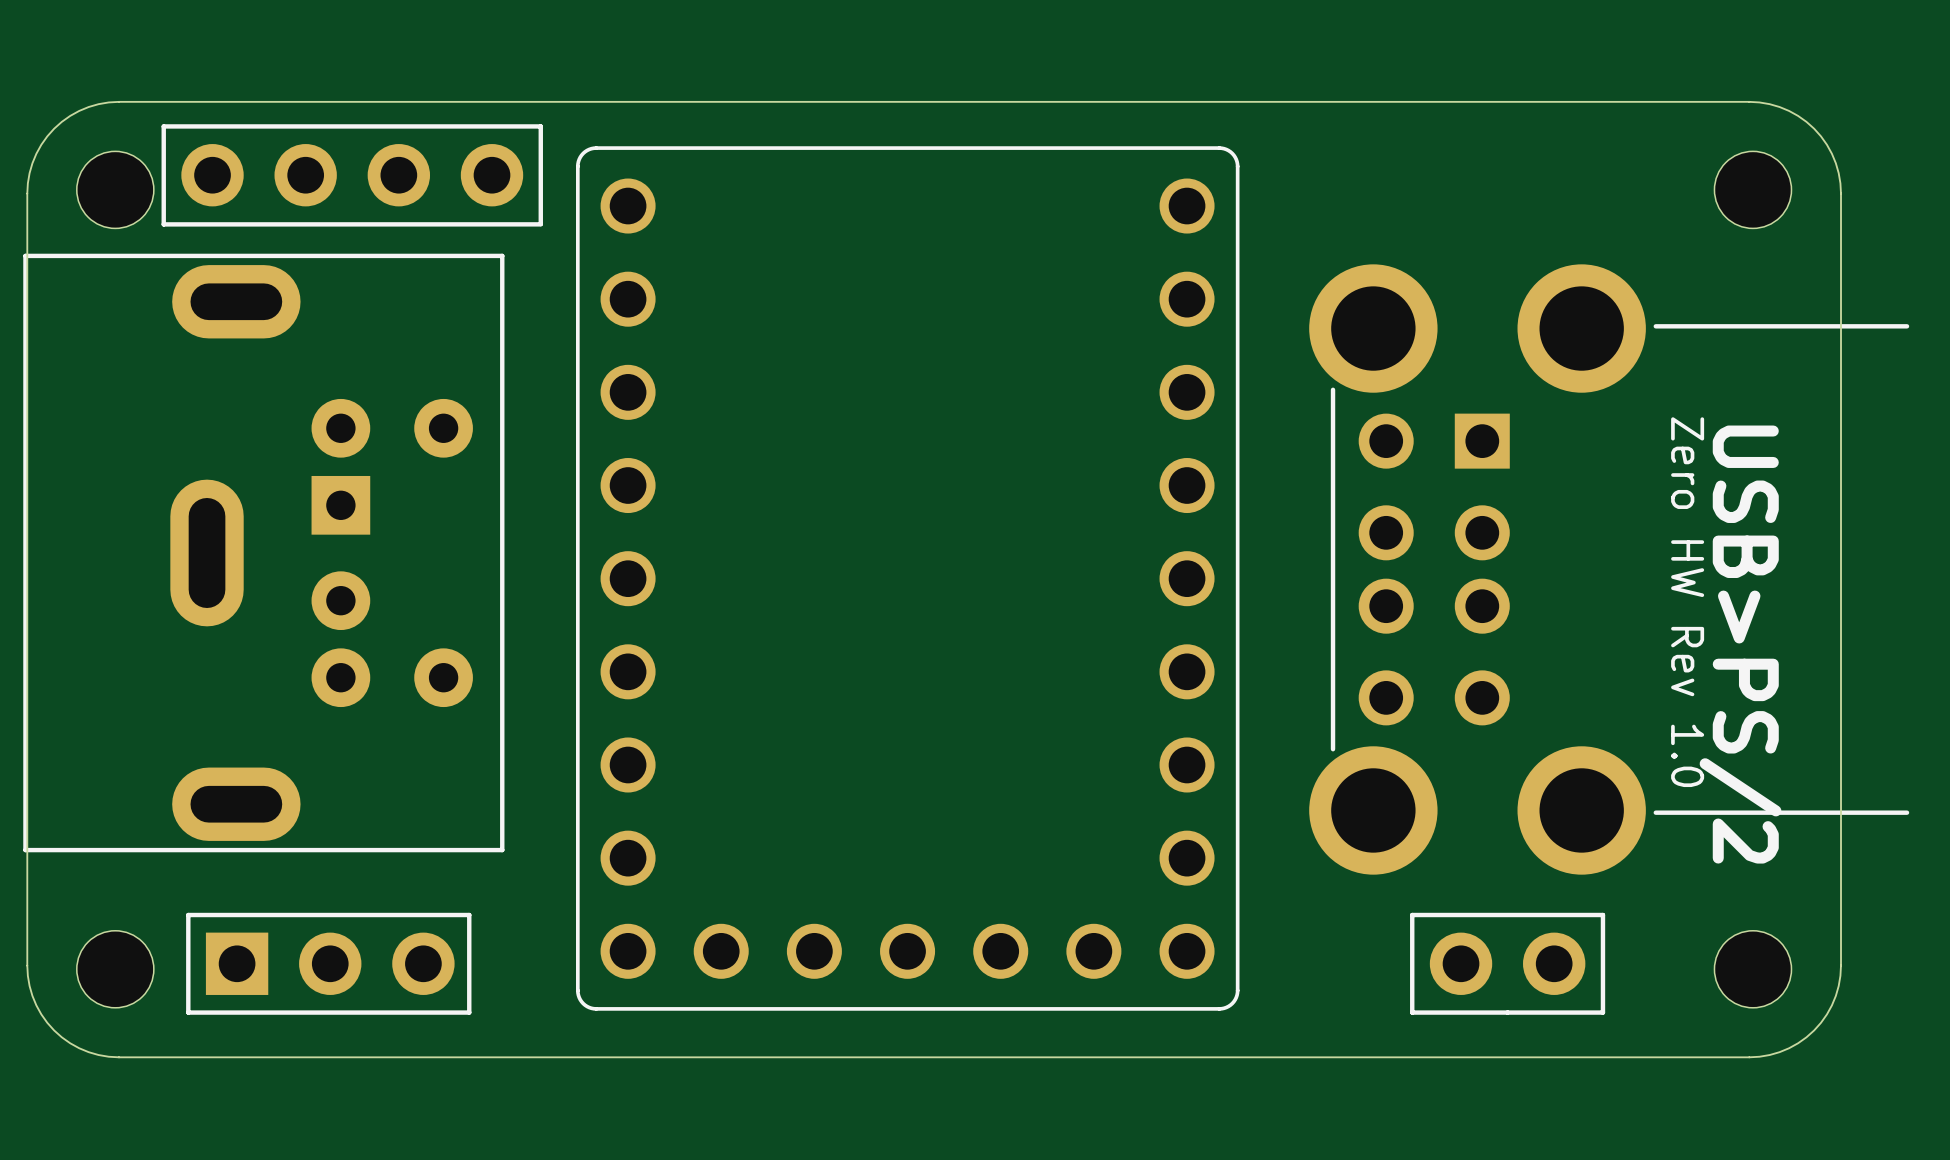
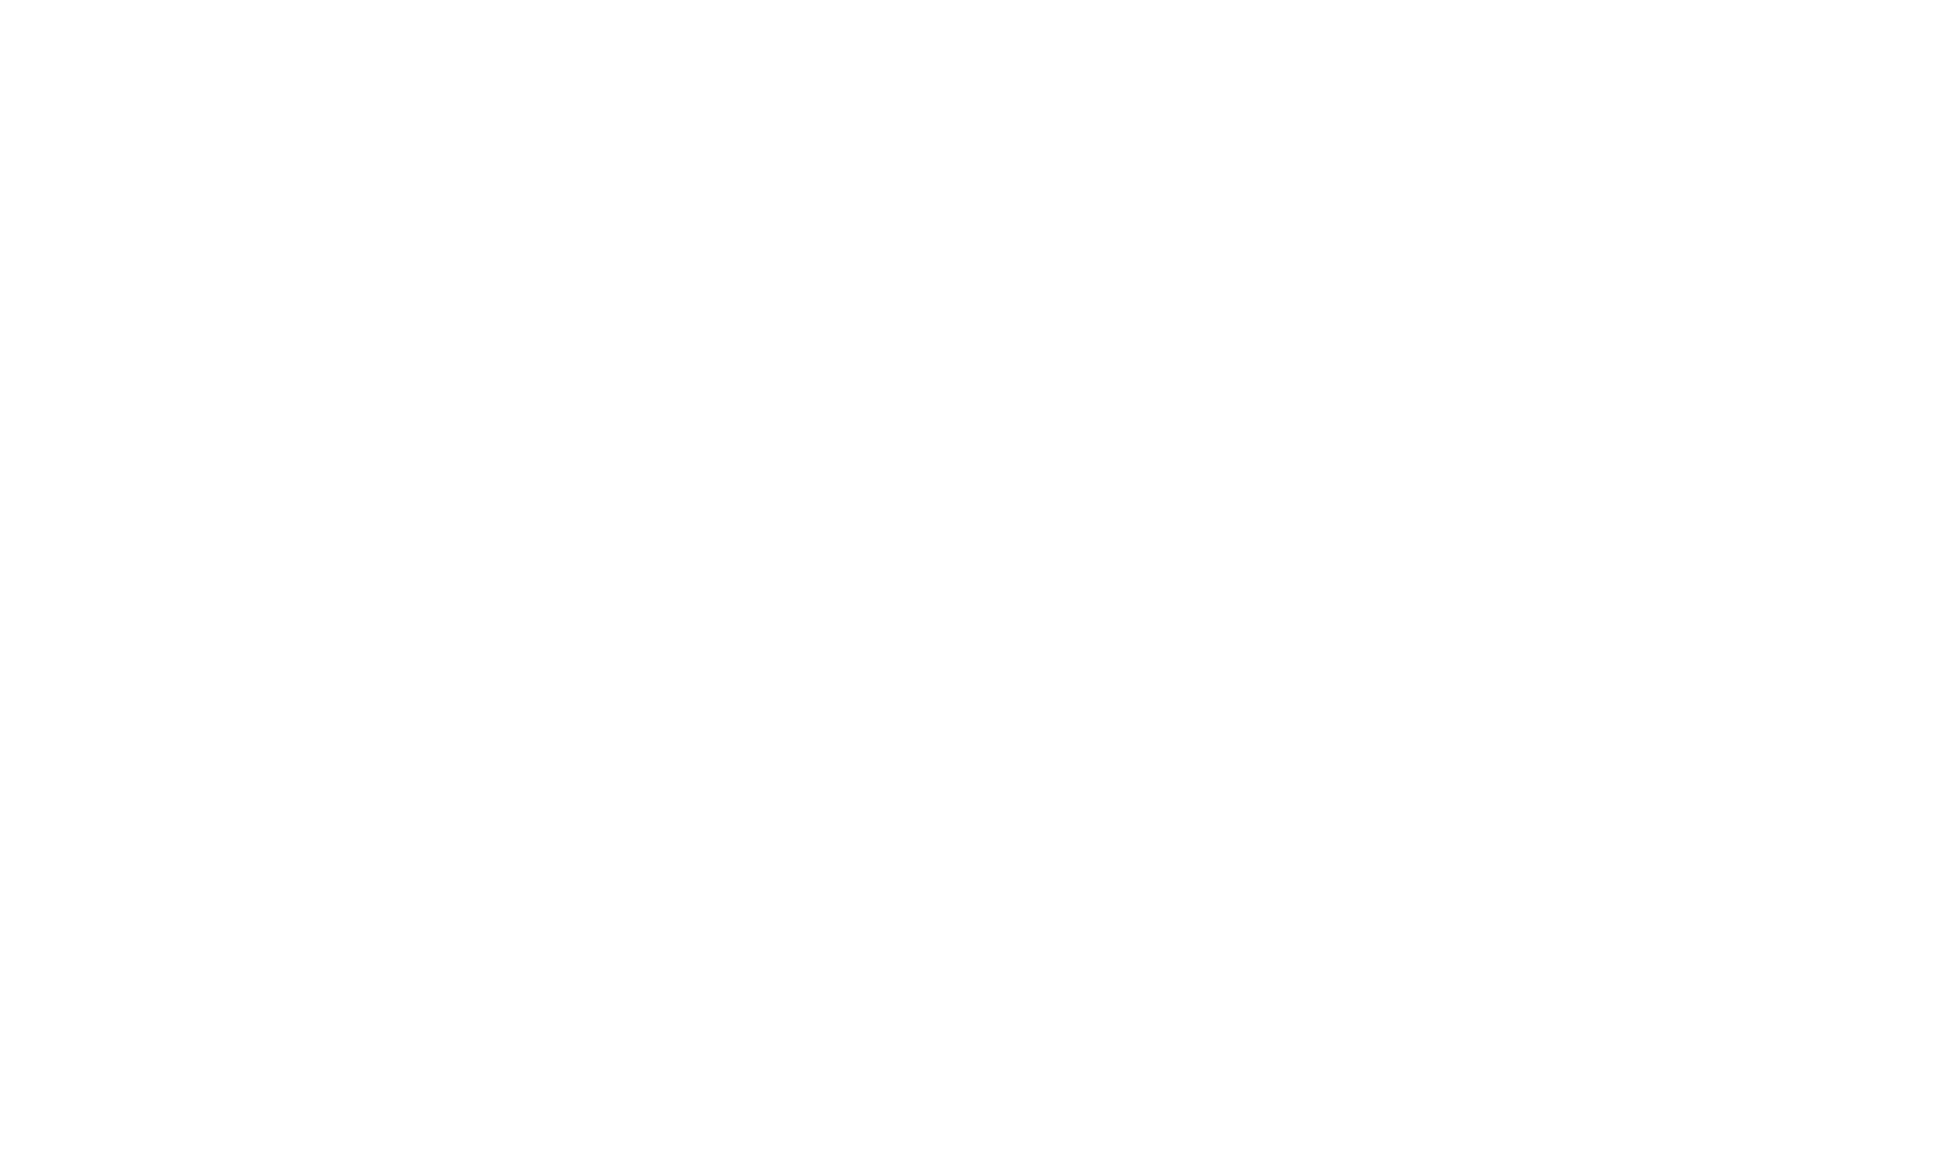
board edge: (1749, 101) (118, 101) (98, 104) (79, 110) (54, 128) (41, 144) (32, 163) (27, 193) (27, 965) (29, 986) (36, 1005) (47, 1022) (70, 1043) (98, 1055) (118, 1057) (1749, 1057) (1769, 1055) (1789, 1048) (1806, 1037) (1821, 1022) (1835, 995) (1840, 975) (1841, 193) (1838, 173) (1831, 153) (1814, 128) (1789, 110) (1769, 104) (1749, 101) -> none
part: (352, 175) -> none
part: (115, 189) -> none
part: (1752, 189) -> none
part: (263, 553) -> none
part: (1609, 569) -> none
part: (907, 578) -> none
text: Zero HW Rev 1.0 (1687, 602) -> none
text: USB>PS/2 (1740, 644) -> none
part: (328, 963) -> none
part: (1507, 963) -> none
part: (115, 969) -> none
part: (1752, 969) -> none

